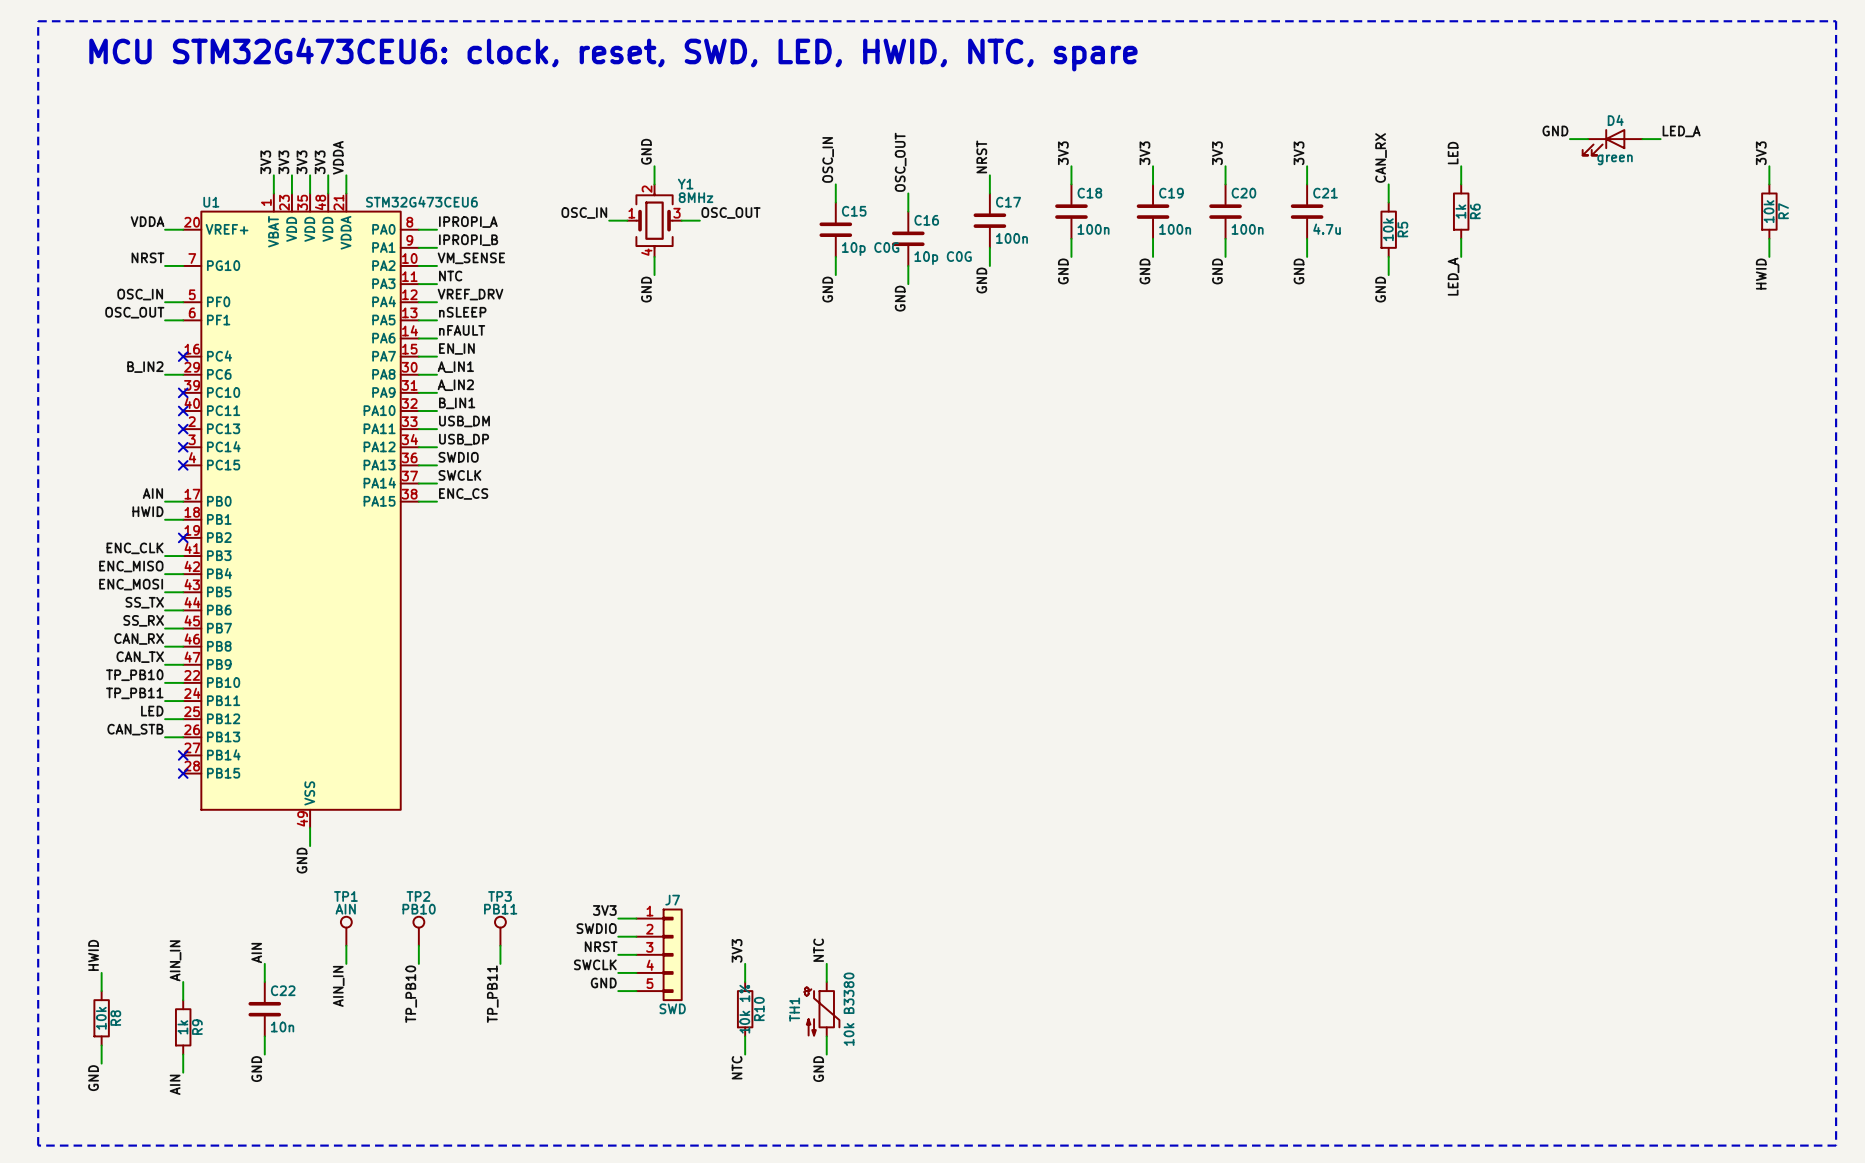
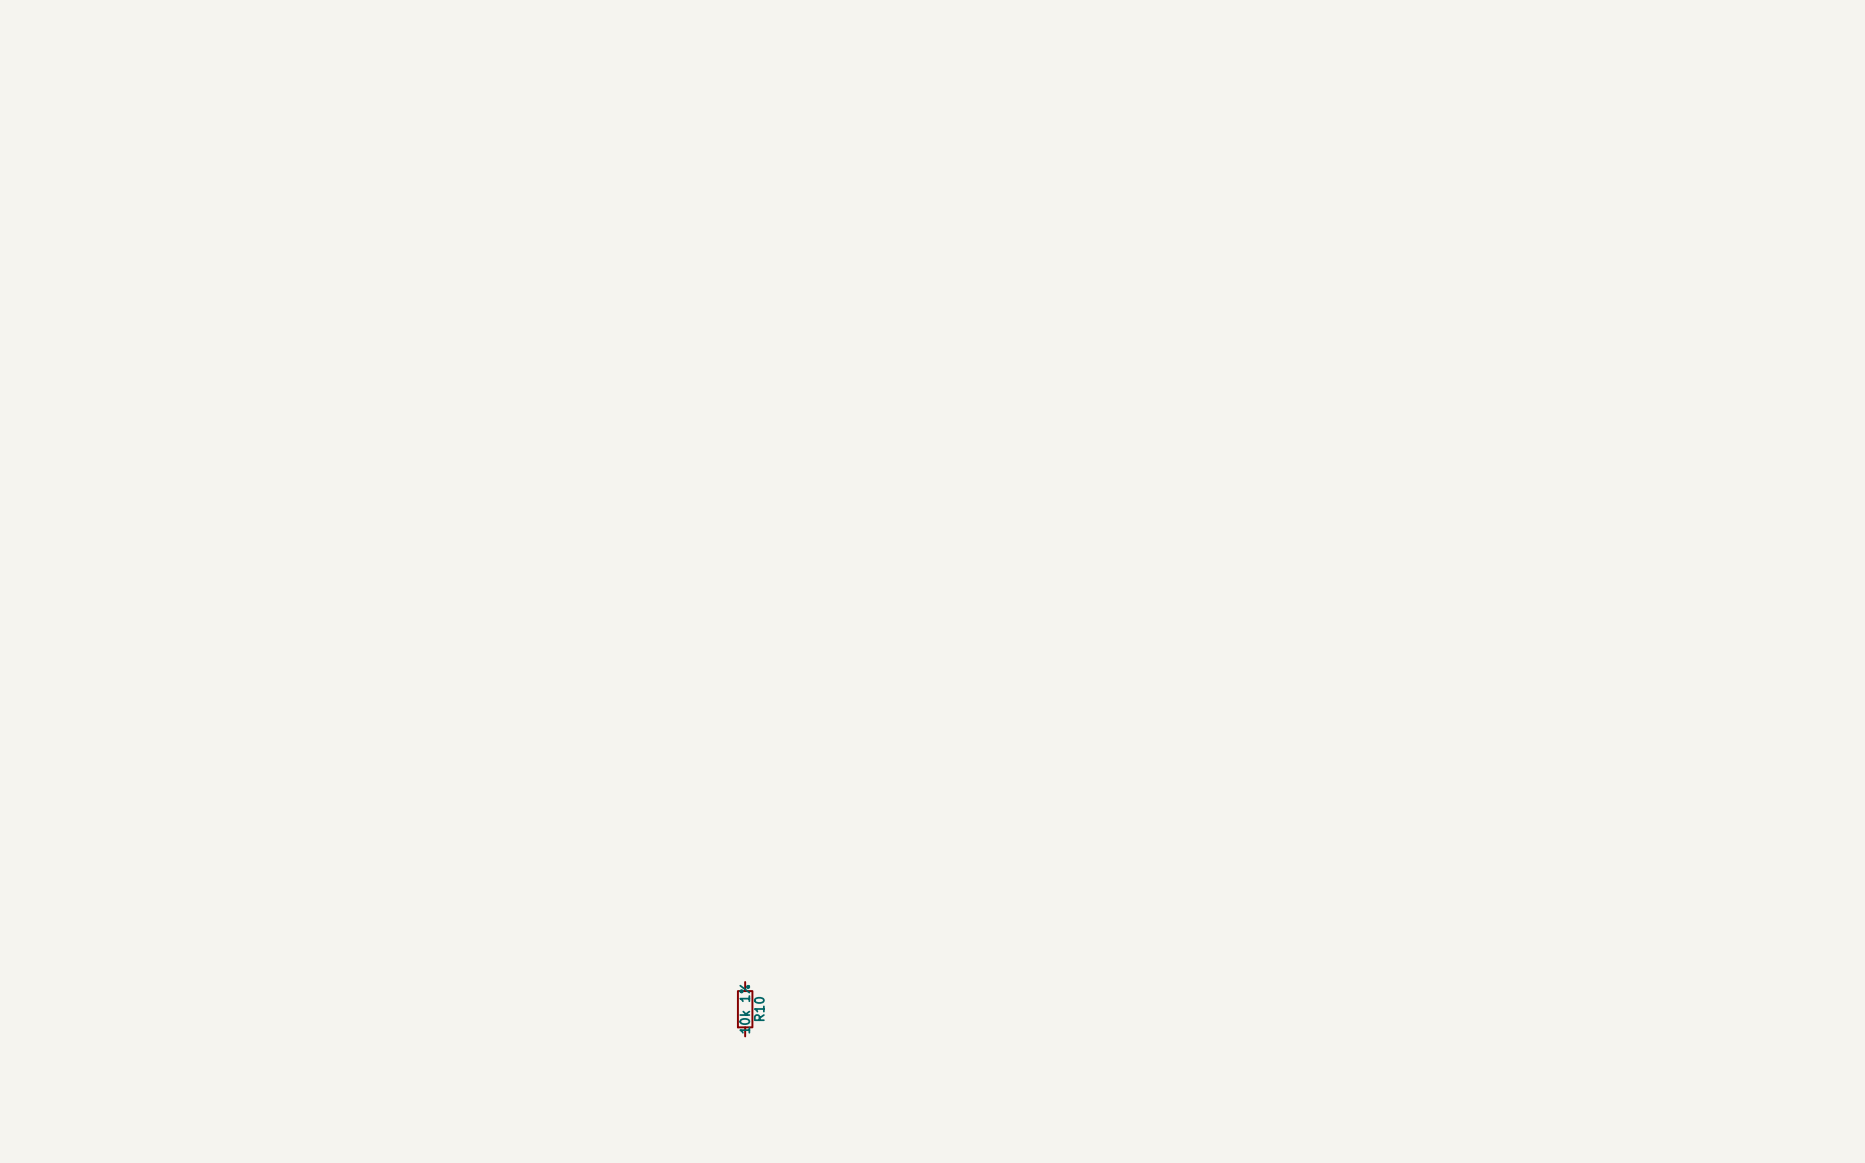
line: (38, 21) (1836, 21) (1836, 1145) (38, 1145) (38, 21) -> none
text: MCU STM32G473CEU6: clock, reset, SWD, LED, HWID, NTC, spare (613, 54) -> none
label: GND (1555, 131) -> none
label: LED_A (1681, 131) -> none
wire: (1569, 139) (1588, 139) -> none
wire: (1642, 139) (1660, 139) -> none
D4: green (1612, 142) -> none
label: GND (646, 151) -> none
label: 3V3 (1063, 153) -> none
label: 3V3 (1144, 153) -> none
label: 3V3 (1217, 153) -> none
label: 3V3 (1299, 153) -> none
label: LED (1453, 153) -> none
label: 3V3 (1761, 153) -> none
label: NRST (981, 156) -> none
label: VDDA (338, 157) -> none
label: CAN_RX (1381, 158) -> none
label: OSC_IN (828, 159) -> none
label: 3V3 (265, 162) -> none
label: 3V3 (283, 162) -> none
label: 3V3 (302, 162) -> none
label: 3V3 (320, 162) -> none
label: OSC_OUT (900, 162) -> none
wire: (654, 166) (654, 184) -> none
wire: (1071, 166) (1071, 184) -> none
wire: (1153, 166) (1153, 184) -> none
wire: (1225, 166) (1225, 184) -> none
wire: (1307, 166) (1307, 184) -> none
wire: (1461, 166) (1461, 184) -> none
wire: (1769, 166) (1769, 184) -> none
wire: (273, 175) (273, 193) -> none
wire: (291, 175) (291, 193) -> none
wire: (310, 175) (310, 193) -> none
wire: (328, 175) (328, 193) -> none
wire: (346, 175) (346, 193) -> none
wire: (989, 175) (989, 193) -> none
wire: (835, 184) (835, 202) -> none
wire: (1388, 184) (1388, 202) -> none
wire: (908, 193) (908, 211) -> none
C18: 100n (1071, 211) -> none
C19: 100n (1153, 211) -> none
C20: 100n (1225, 211) -> none
C21: 4.7u (1307, 211) -> none
R6: 1k (1461, 211) -> none
R7: 10k (1769, 211) -> none
label: OSC_IN (584, 213) -> none
label: OSC_OUT (730, 213) -> none
wire: (609, 220) (627, 220) -> none
Y1: 8MHz (654, 220) -> none
wire: (681, 220) (699, 220) -> none
C17: 100n (989, 220) -> none
label: VDDA (147, 221) -> none
label: IPROPI_A (468, 222) -> none
wire: (165, 229) (183, 229) -> none
wire: (418, 229) (436, 229) -> none
C15: 10p C0G (835, 229) -> none
R5: 10k (1388, 229) -> none
C16: 10p C0G (908, 238) -> none
wire: (1071, 238) (1071, 256) -> none
wire: (1153, 238) (1153, 256) -> none
wire: (1225, 238) (1225, 256) -> none
wire: (1307, 238) (1307, 256) -> none
wire: (1461, 238) (1461, 256) -> none
wire: (1769, 238) (1769, 256) -> none
label: IPROPI_B (468, 240) -> none
wire: (418, 247) (436, 247) -> none
wire: (989, 247) (989, 265) -> none
wire: (654, 256) (654, 275) -> none
wire: (835, 256) (835, 275) -> none
wire: (1388, 256) (1388, 275) -> none
label: NRST (147, 257) -> none
label: VM_SENSE (471, 258) -> none
wire: (165, 265) (183, 265) -> none
wire: (418, 265) (436, 265) -> none
wire: (908, 265) (908, 284) -> none
label: GND (1063, 271) -> none
label: GND (1144, 271) -> none
label: GND (1217, 271) -> none
label: GND (1299, 271) -> none
label: HWID (1761, 274) -> none
label: NTC (450, 276) -> none
label: LED_A (1453, 276) -> none
label: GND (981, 280) -> none
wire: (418, 284) (436, 284) -> none
label: GND (646, 289) -> none
label: GND (827, 289) -> none
label: GND (1380, 289) -> none
label: OSC_IN (140, 294) -> none
label: VREF_DRV (470, 294) -> none
label: GND (900, 298) -> none
wire: (165, 302) (183, 302) -> none
wire: (418, 302) (436, 302) -> none
label: OSC_OUT (134, 312) -> none
label: nSLEEP (462, 312) -> none
wire: (165, 320) (183, 320) -> none
wire: (418, 320) (436, 320) -> none
label: nFAULT (462, 330) -> none
wire: (418, 338) (436, 338) -> none
label: EN_IN (456, 348) -> none
no-connect mark: (183, 356) -> none
wire: (418, 356) (436, 356) -> none
label: B_IN2 (145, 367) -> none
label: A_IN1 (455, 367) -> none
wire: (165, 374) (183, 374) -> none
wire: (418, 374) (436, 374) -> none
label: A_IN2 (455, 385) -> none
no-connect mark: (183, 392) -> none
wire: (418, 392) (436, 392) -> none
label: B_IN1 (457, 403) -> none
no-connect mark: (183, 411) -> none
wire: (418, 411) (436, 411) -> none
label: USB_DM (464, 421) -> none
no-connect mark: (183, 429) -> none
wire: (418, 429) (436, 429) -> none
label: USB_DP (464, 439) -> none
no-connect mark: (183, 447) -> none
wire: (418, 447) (436, 447) -> none
label: SWDIO (458, 457) -> none
no-connect mark: (183, 465) -> none
wire: (418, 465) (436, 465) -> none
label: SWCLK (459, 475) -> none
wire: (418, 483) (436, 483) -> none
label: AIN (152, 493) -> none
label: ENC_CS (463, 493) -> none
wire: (165, 501) (183, 501) -> none
wire: (418, 501) (436, 501) -> none
U1: STM32G473CEU6 (301, 510) -> none
label: HWID (147, 511) -> none
wire: (165, 519) (183, 519) -> none
no-connect mark: (183, 537) -> none
label: ENC_CLK (135, 548) -> none
wire: (165, 556) (183, 556) -> none
label: ENC_MISO (131, 566) -> none
wire: (165, 574) (183, 574) -> none
label: ENC_MOSI (131, 584) -> none
wire: (165, 592) (183, 592) -> none
label: SS_TX (144, 602) -> none
wire: (165, 610) (183, 610) -> none
label: SS_RX (143, 620) -> none
wire: (165, 628) (183, 628) -> none
label: CAN_RX (139, 639) -> none
wire: (165, 646) (183, 646) -> none
label: CAN_TX (140, 657) -> none
wire: (165, 664) (183, 664) -> none
label: TP_PB10 (134, 675) -> none
wire: (165, 682) (183, 682) -> none
label: TP_PB11 (134, 693) -> none
wire: (165, 701) (183, 701) -> none
label: LED (152, 711) -> none
wire: (165, 719) (183, 719) -> none
label: CAN_STB (135, 729) -> none
wire: (165, 737) (183, 737) -> none
no-connect mark: (183, 755) -> none
no-connect mark: (183, 773) -> none
wire: (310, 827) (310, 846) -> none
label: GND (302, 860) -> none
label: 3V3 (604, 910) -> none
wire: (618, 918) (636, 918) -> none
label: SWDIO (596, 928) -> none
TP1: AIN (346, 931) -> none
TP2: PB10 (418, 931) -> none
TP3: PB11 (500, 931) -> none
wire: (618, 936) (636, 936) -> none
wire: (346, 945) (346, 963) -> none
wire: (418, 945) (418, 963) -> none
wire: (500, 945) (500, 963) -> none
label: NRST (601, 946) -> none
label: 3V3 (737, 950) -> none
label: NTC (818, 950) -> none
label: AIN (256, 953) -> none
wire: (618, 954) (636, 954) -> none
J7: SWD (659, 954) -> none
label: HWID (93, 955) -> none
label: AIN_IN (175, 960) -> none
wire: (264, 963) (264, 982) -> none
wire: (745, 963) (745, 982) -> none
wire: (826, 963) (826, 982) -> none
label: SWCLK (595, 964) -> none
wire: (101, 972) (101, 991) -> none
wire: (618, 972) (636, 972) -> none
wire: (183, 982) (183, 1000) -> none
label: GND (603, 982) -> none
label: AIN_IN (338, 986) -> none
wire: (618, 991) (636, 991) -> none
label: TP_PB10 (411, 994) -> none
label: TP_PB11 (492, 994) -> none
C22: 10n (264, 1009) -> none
TH1: 10k B3380 (821, 1009) -> none
R8: 10k (101, 1018) -> none
R9: 1k (183, 1027) -> none
wire: (264, 1036) (264, 1054) -> none
wire: (745, 1036) (745, 1054) -> none
wire: (826, 1036) (826, 1054) -> none
wire: (101, 1045) (101, 1063) -> none
wire: (183, 1054) (183, 1072) -> none
label: NTC (737, 1067) -> none
label: GND (256, 1069) -> none
label: GND (818, 1069) -> none
label: GND (93, 1078) -> none
label: AIN (175, 1084) -> none

